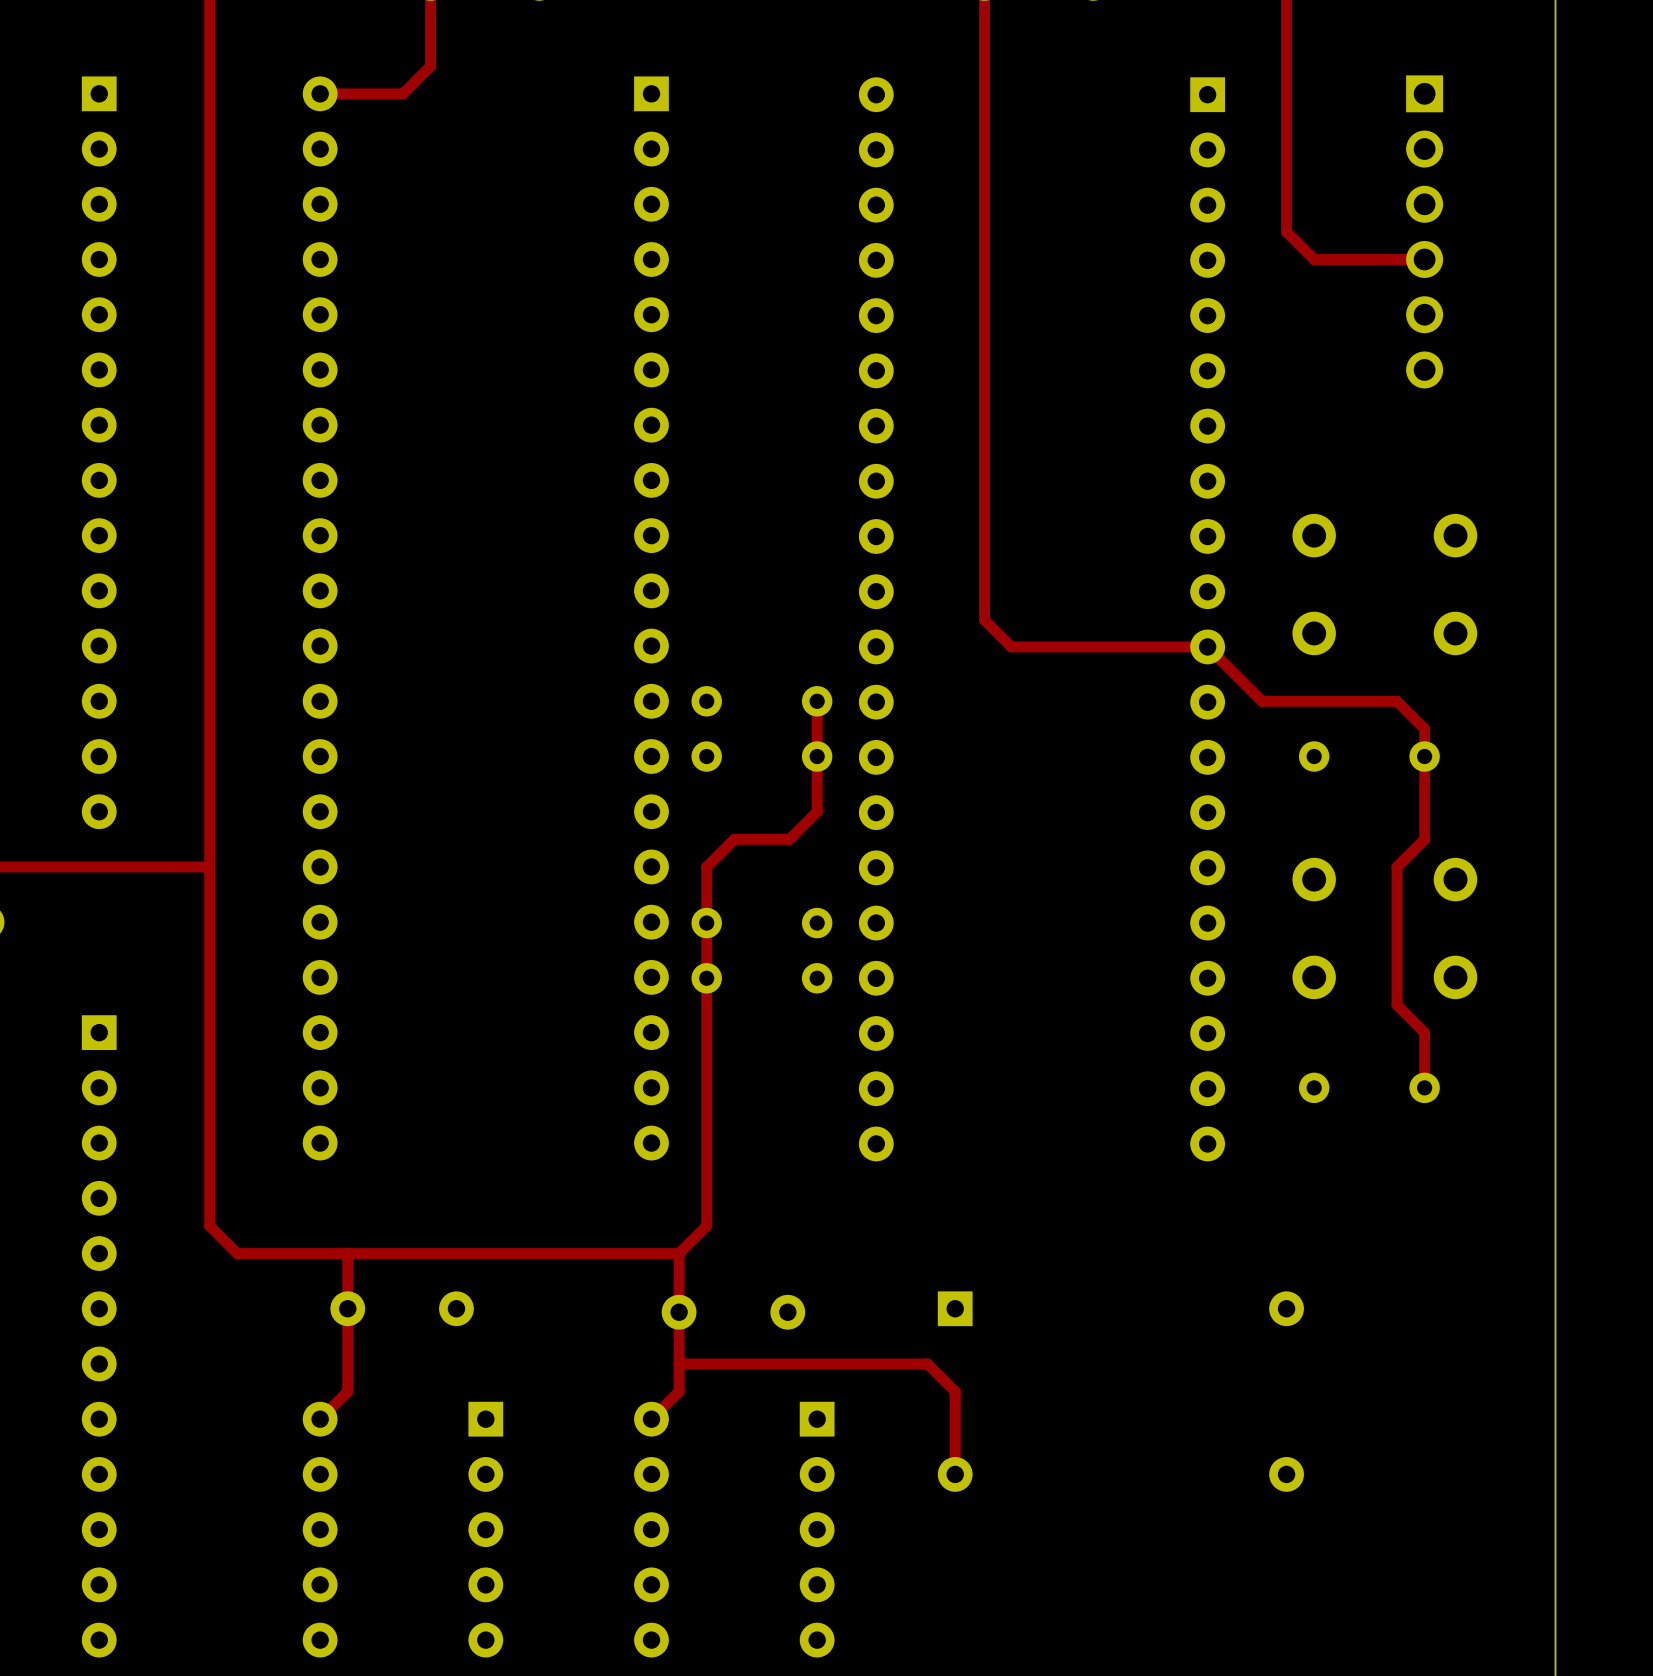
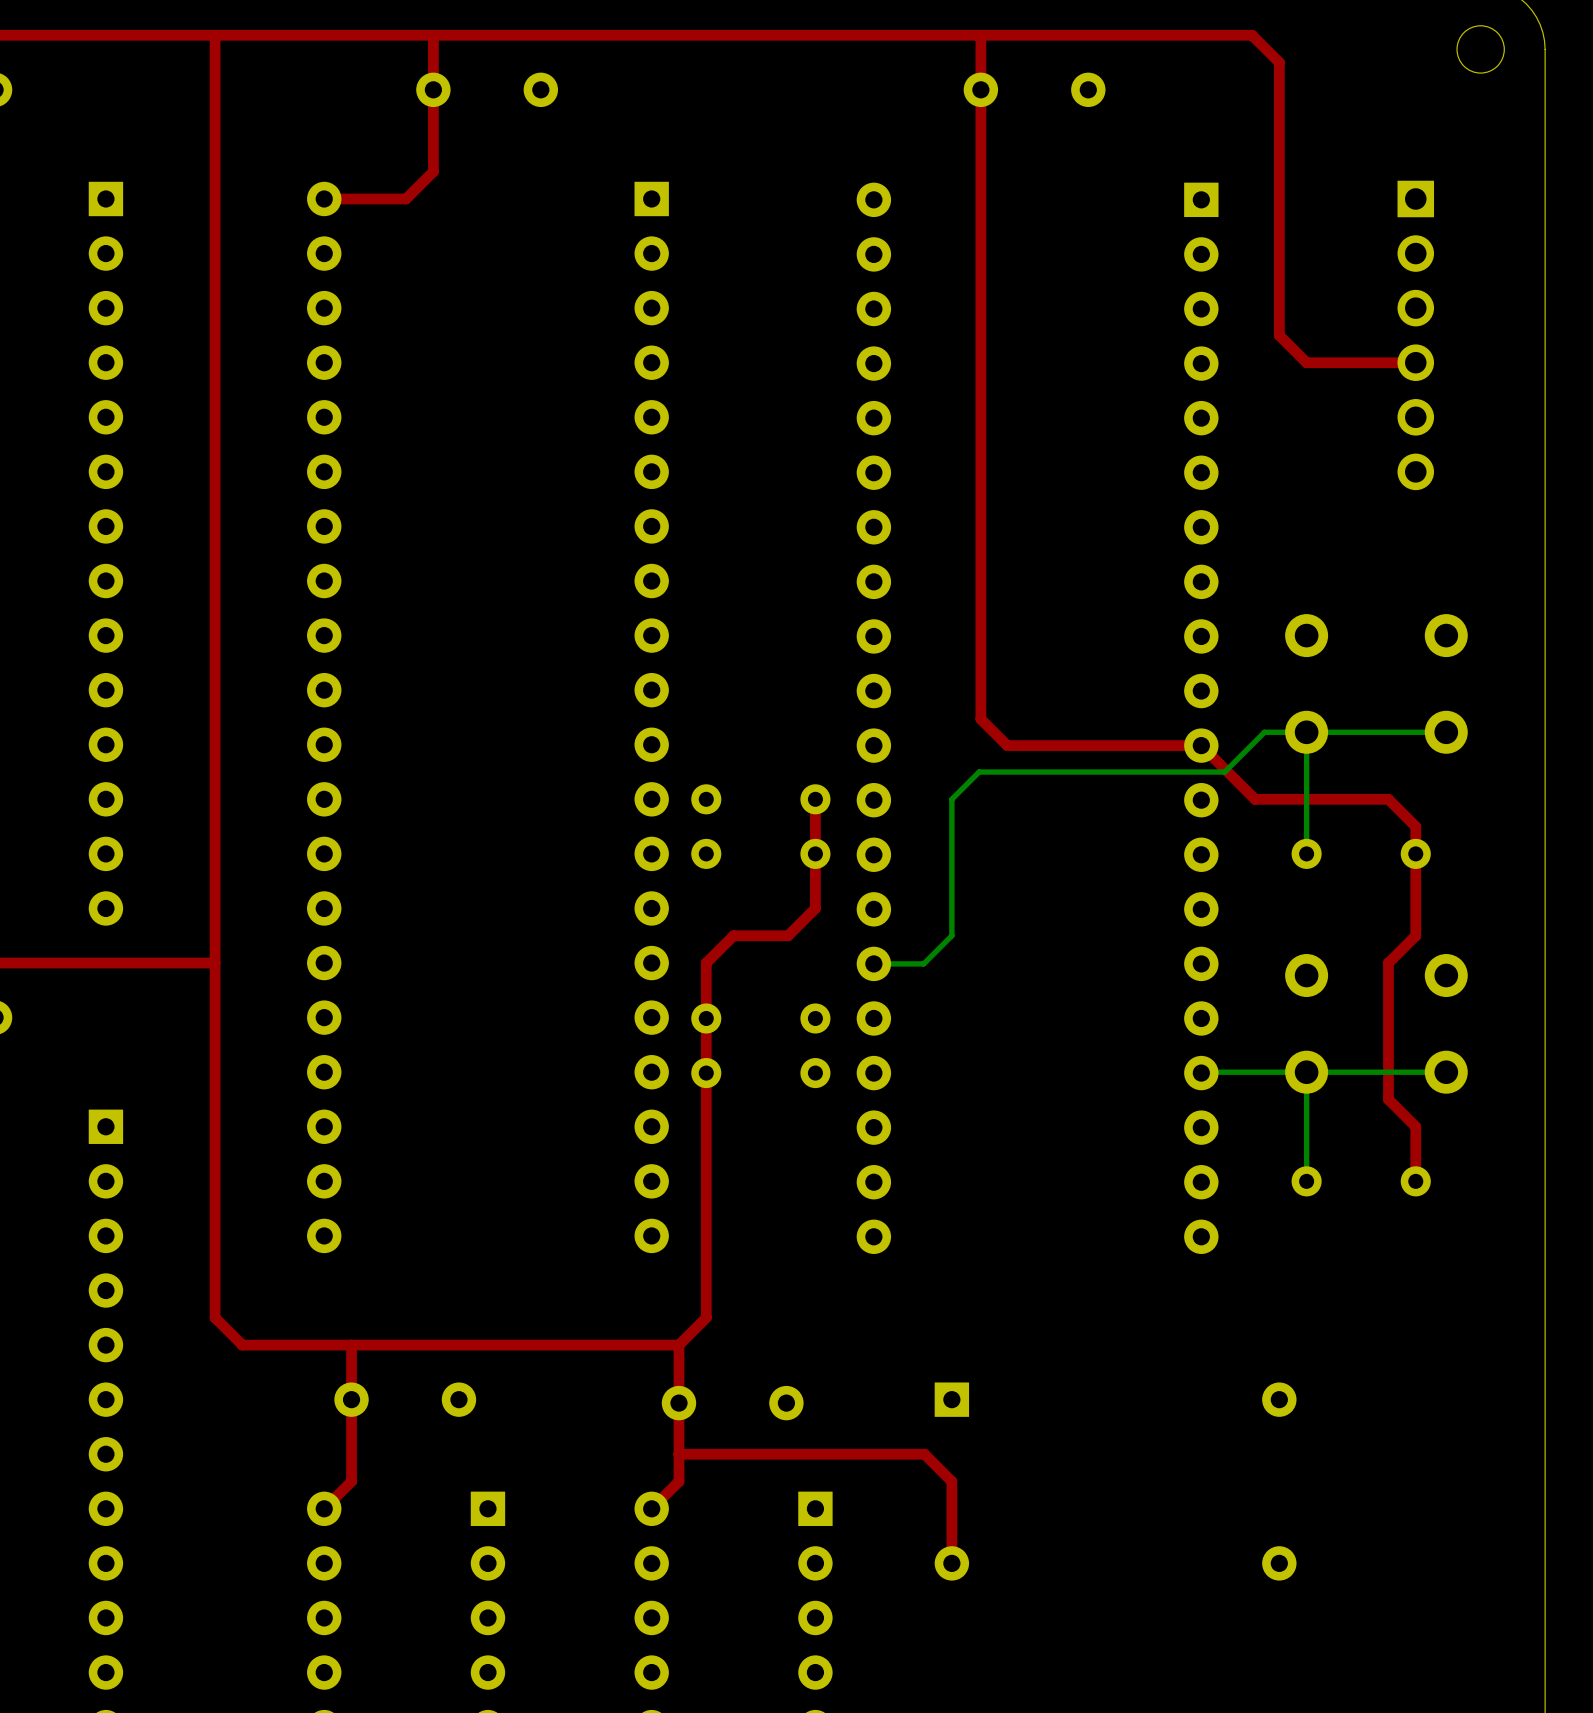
bottom track: none -> (1306, 732) (1306, 853)
bottom track: none -> (1446, 732) (1264, 732) (1224, 772) (979, 772) (951, 799) (951, 935) (923, 963) (873, 963)
bottom track: none -> (1306, 1072) (1306, 1181)
bottom track: none -> (1446, 1072) (1201, 1073)

